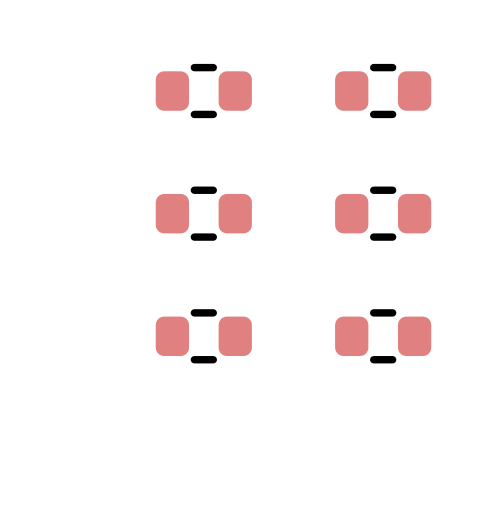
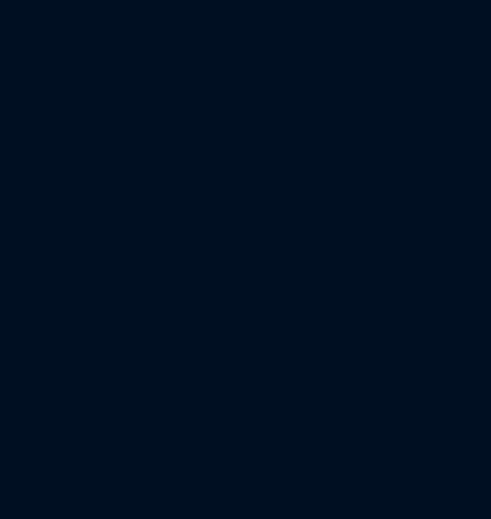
part: (203, 91) -> none
part: (383, 91) -> none
part: (203, 213) -> none
part: (383, 213) -> none
part: (203, 336) -> none
part: (383, 336) -> none

